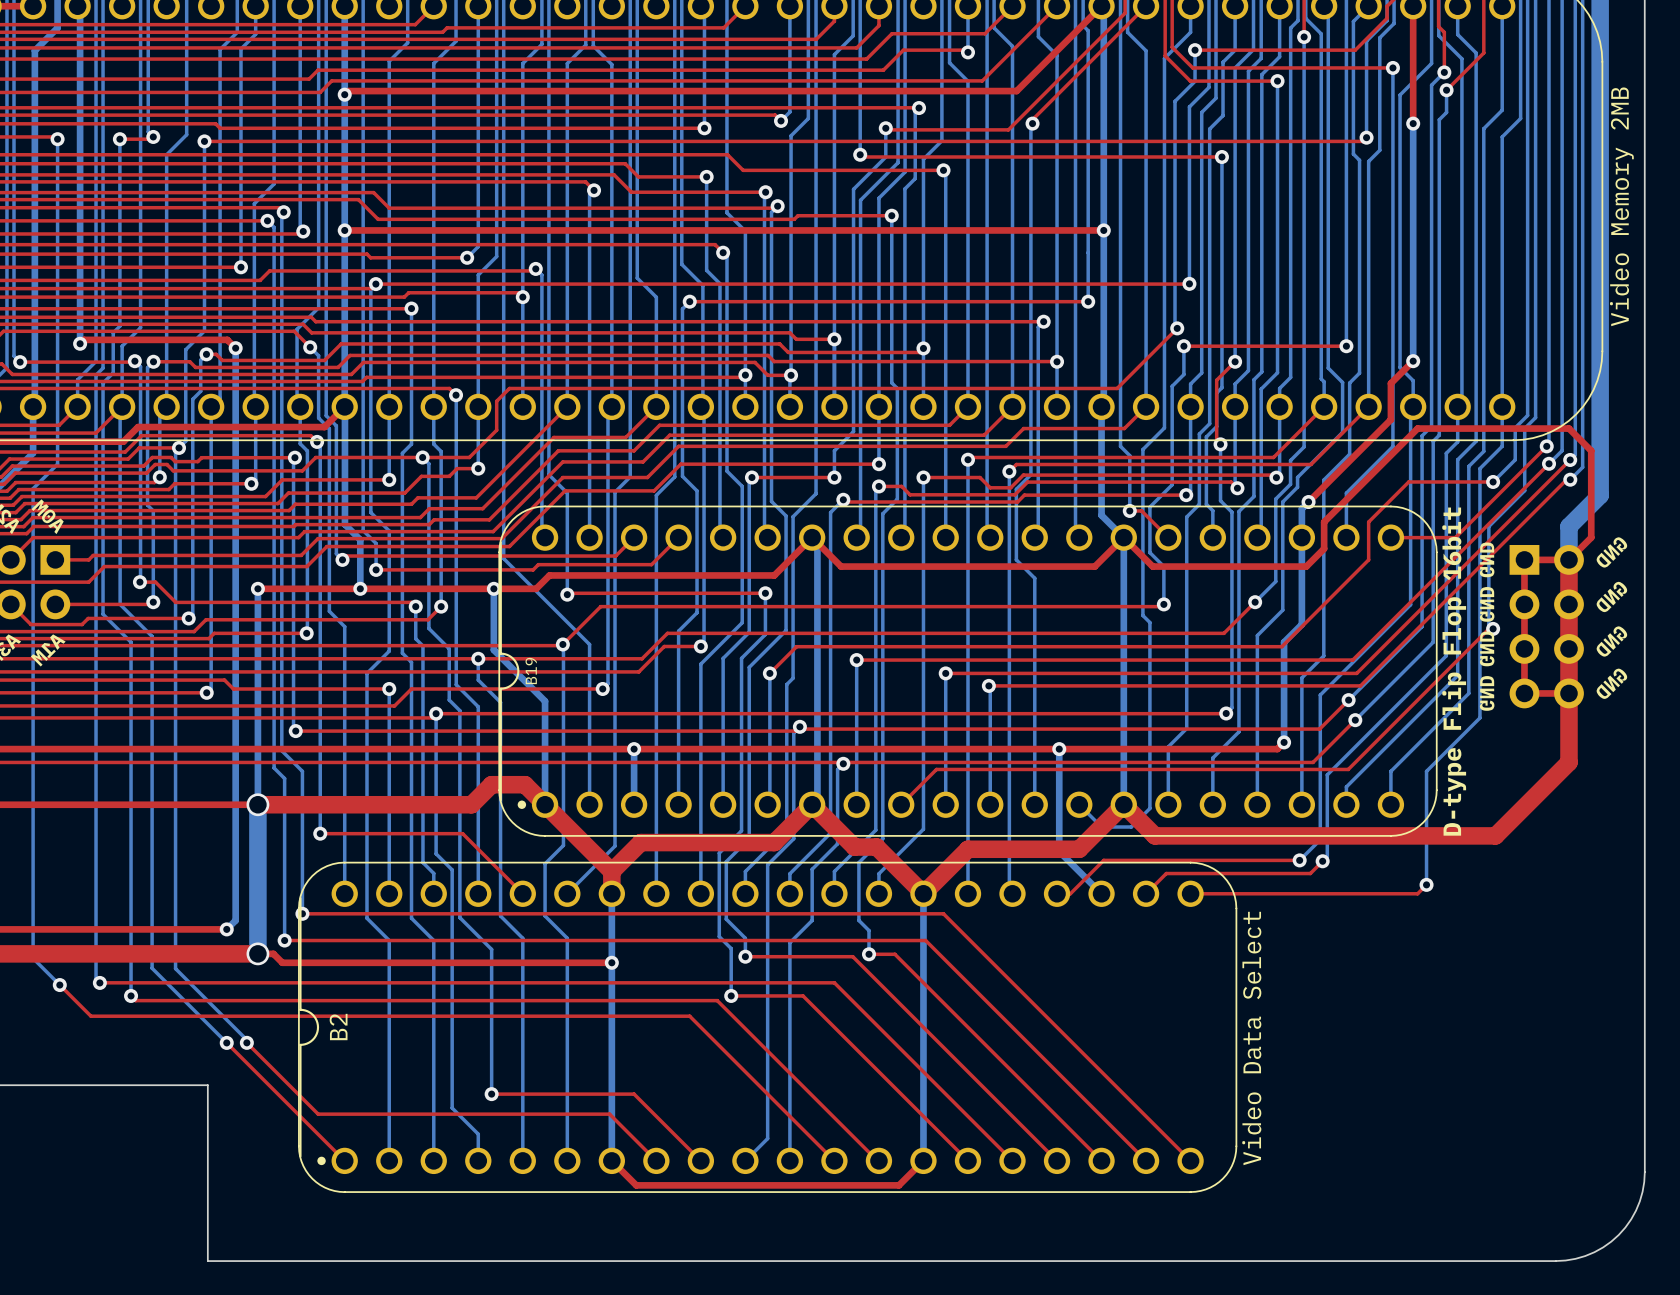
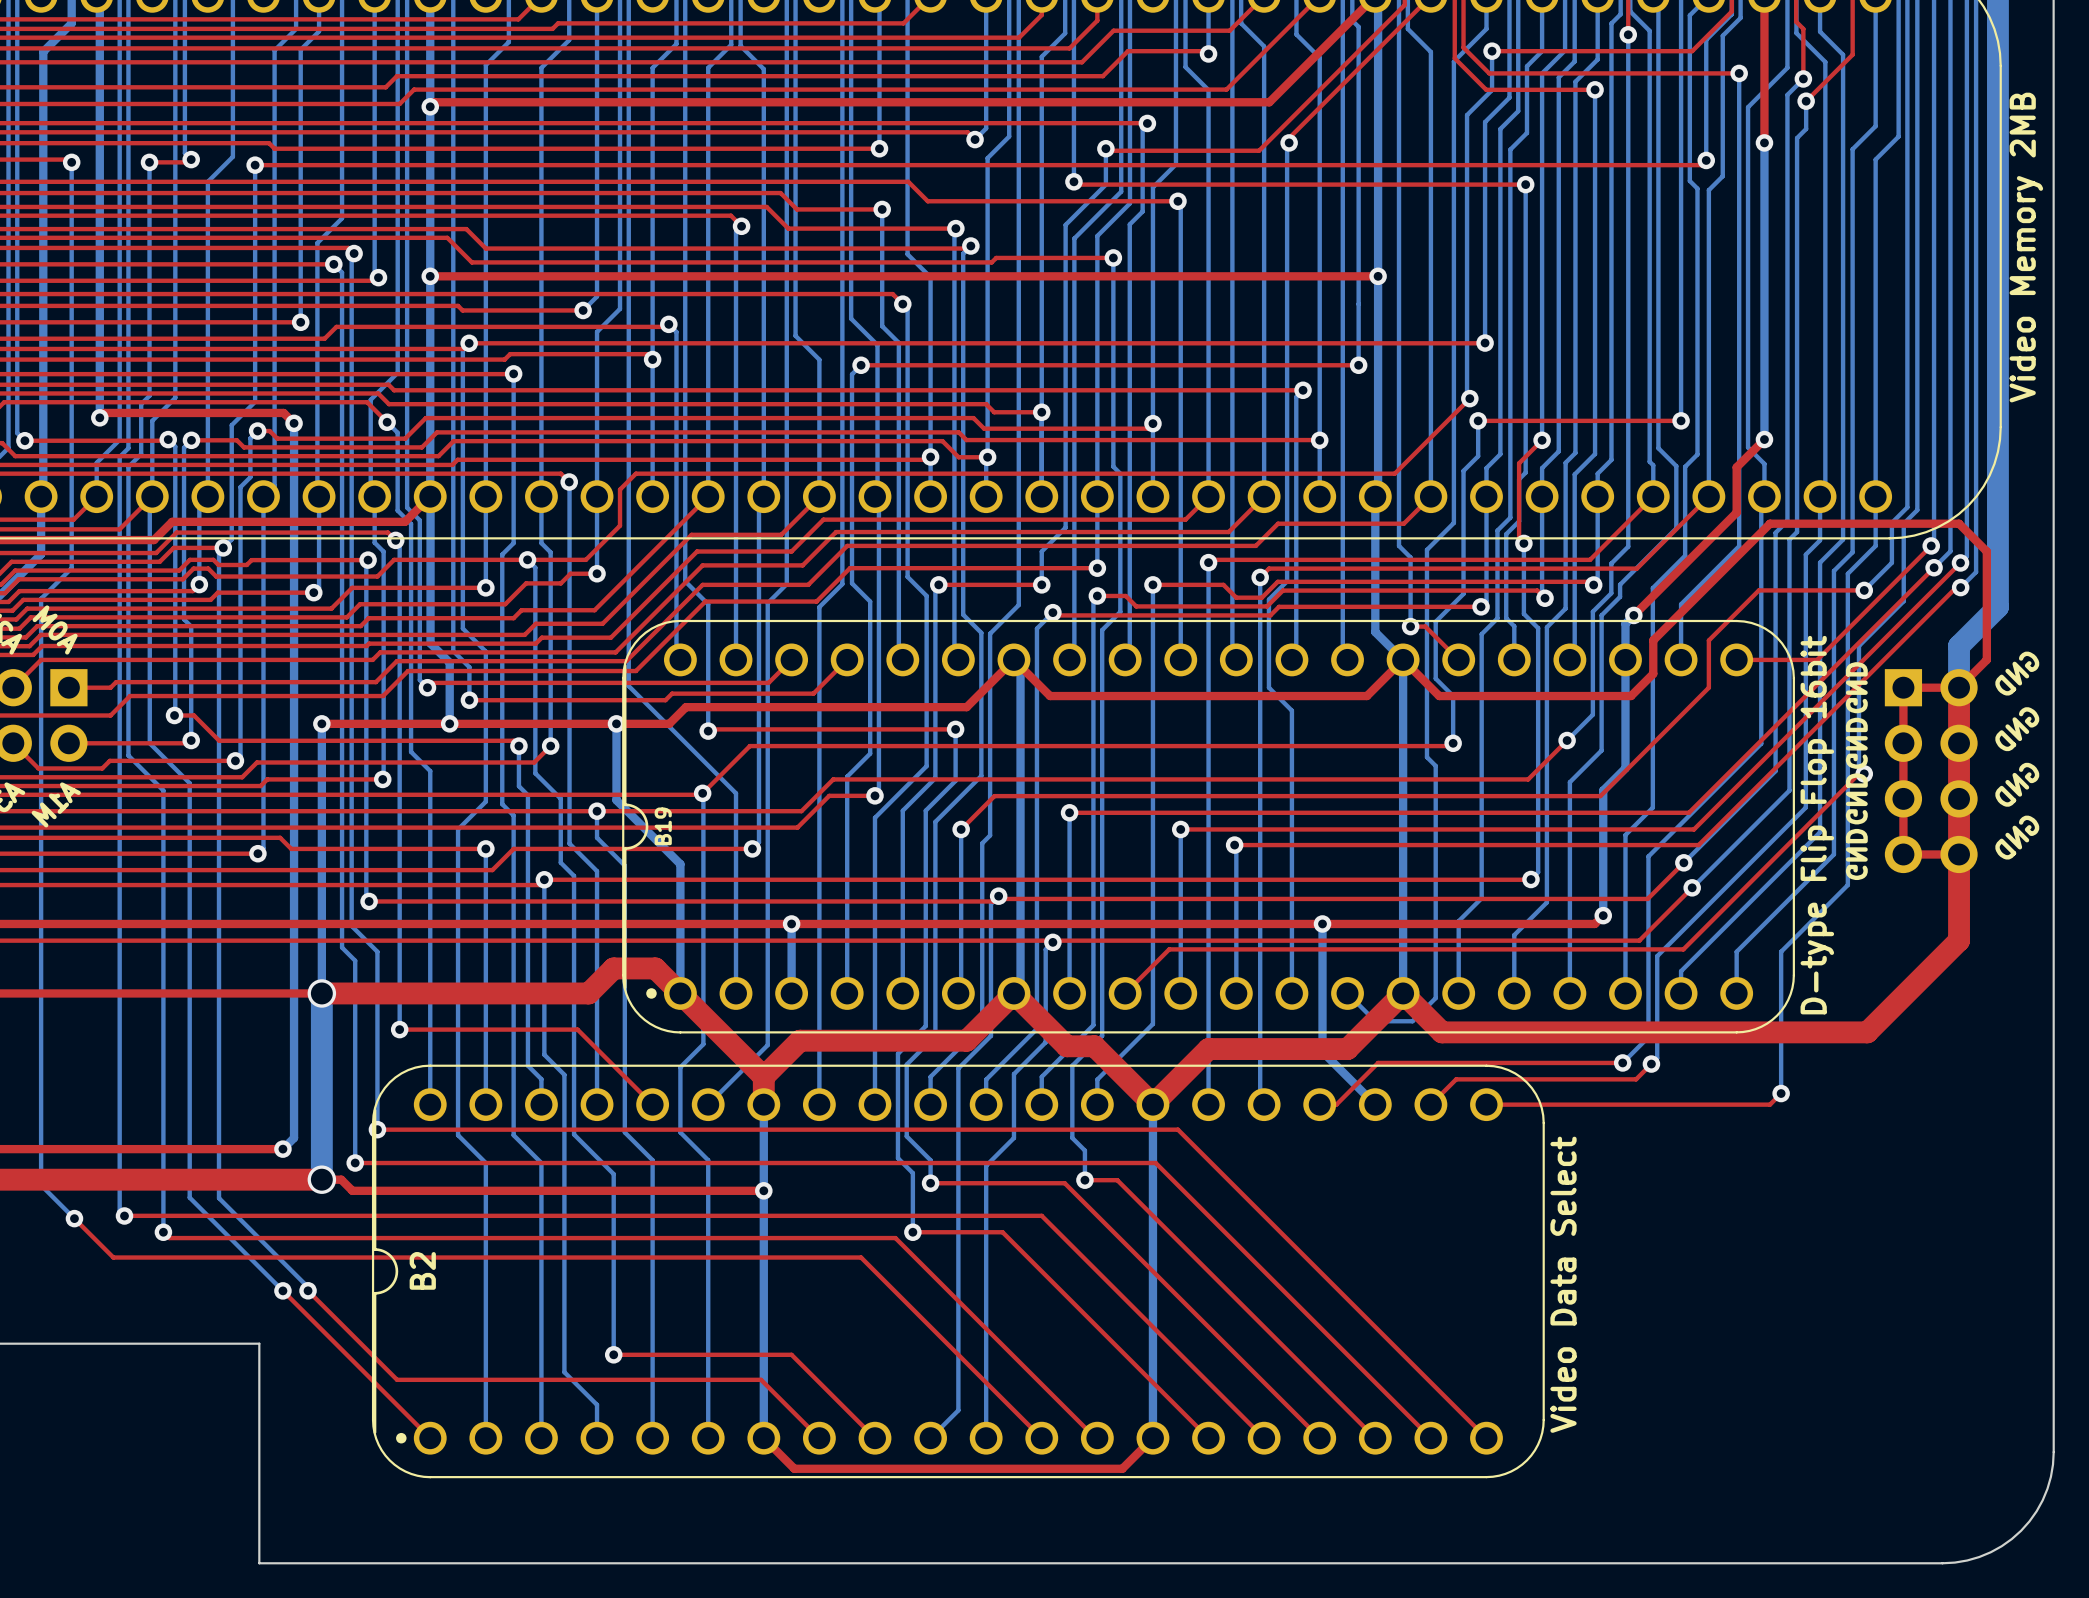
B19 text: none -> D-type Flip Flop 16bit (1817, 825)
B19 text: D-type Flip Flop 16bit (1454, 671) -> none

